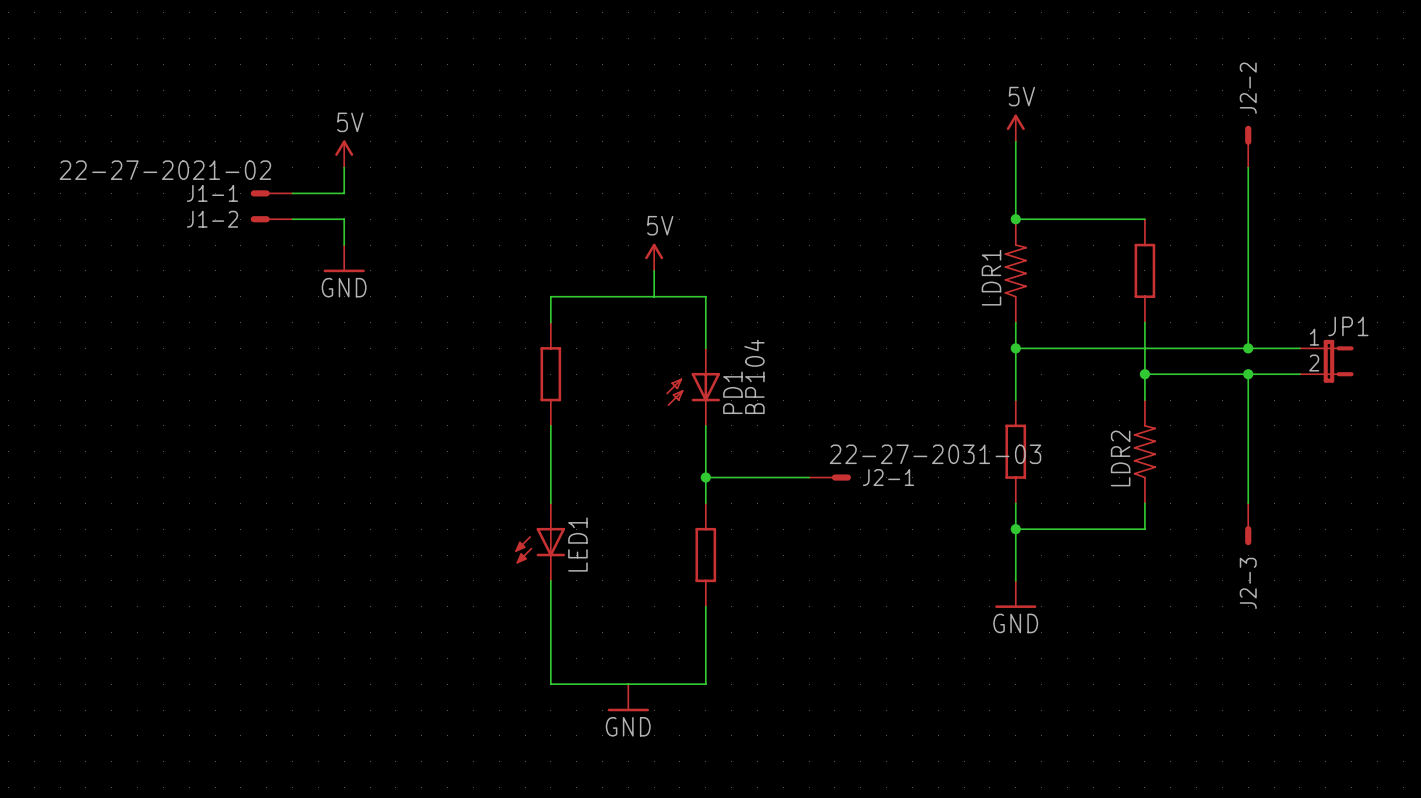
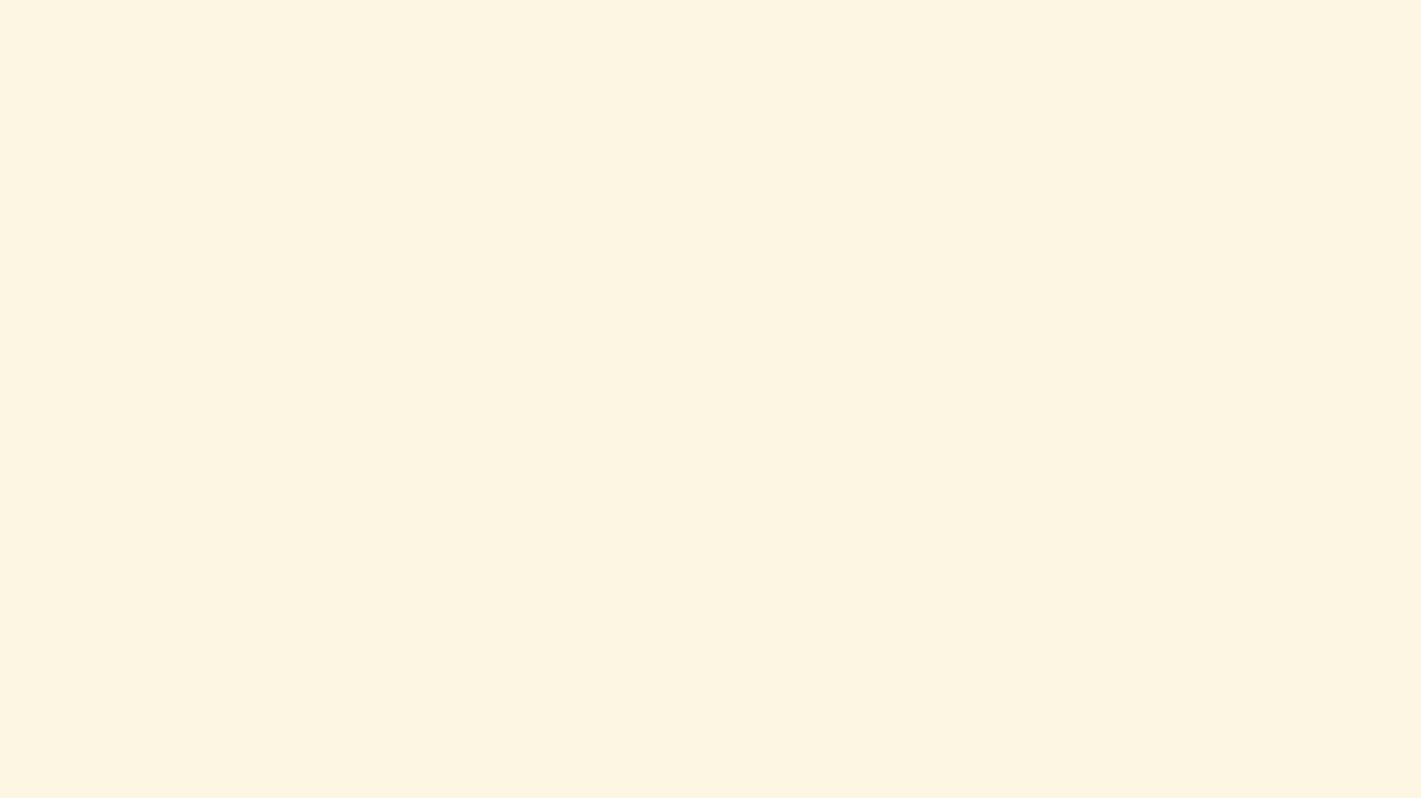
power symbol: 5V (1015, 128) -> none
wire: (1015, 141) (1015, 219) (1144, 219) -> none
J2-2: (1248, 146) -> none
power symbol: 5V (344, 154) -> none
wire: (344, 167) (344, 193) (292, 193) -> none
wire: (1248, 167) (1248, 348) -> none
J1-1: 22-27-2021-02 (271, 193) -> none
J1-2: (271, 219) -> none
wire: (292, 219) (344, 219) (344, 245) -> none
junction: (1015, 219) -> none
power symbol: 5V (654, 257) -> none
power symbol: GND (344, 258) -> none
wire: (654, 270) (654, 296) -> none
LDR1: (1015, 270) -> none
part: (1144, 270) -> none
wire: (550, 322) (550, 296) (705, 296) (705, 348) -> none
wire: (1015, 322) (1015, 400) -> none
wire: (1144, 322) (1144, 400) -> none
wire: (1015, 348) (1299, 348) -> none
junction: (1015, 348) -> none
junction: (1248, 348) -> none
JP1: (1326, 361) -> none
part: (550, 374) -> none
wire: (1144, 374) (1299, 374) -> none
junction: (1144, 374) -> none
wire: (1248, 374) (1248, 503) -> none
junction: (1248, 374) -> none
PD1: BP104 (693, 386) -> none
wire: (550, 425) (550, 503) -> none
wire: (705, 425) (705, 503) -> none
part: (1015, 451) -> none
LDR2: (1144, 451) -> none
wire: (705, 477) (809, 477) -> none
junction: (705, 477) -> none
J2-1: 22-27-2031-03 (830, 477) -> none
wire: (1015, 503) (1015, 580) -> none
wire: (1144, 503) (1144, 529) (1015, 529) -> none
J2-3: (1248, 524) -> none
junction: (1015, 529) -> none
LED1: (540, 542) -> none
part: (705, 555) -> none
wire: (550, 580) (550, 684) (705, 684) (705, 606) -> none
power symbol: GND (1015, 594) -> none
power symbol: GND (628, 697) -> none

